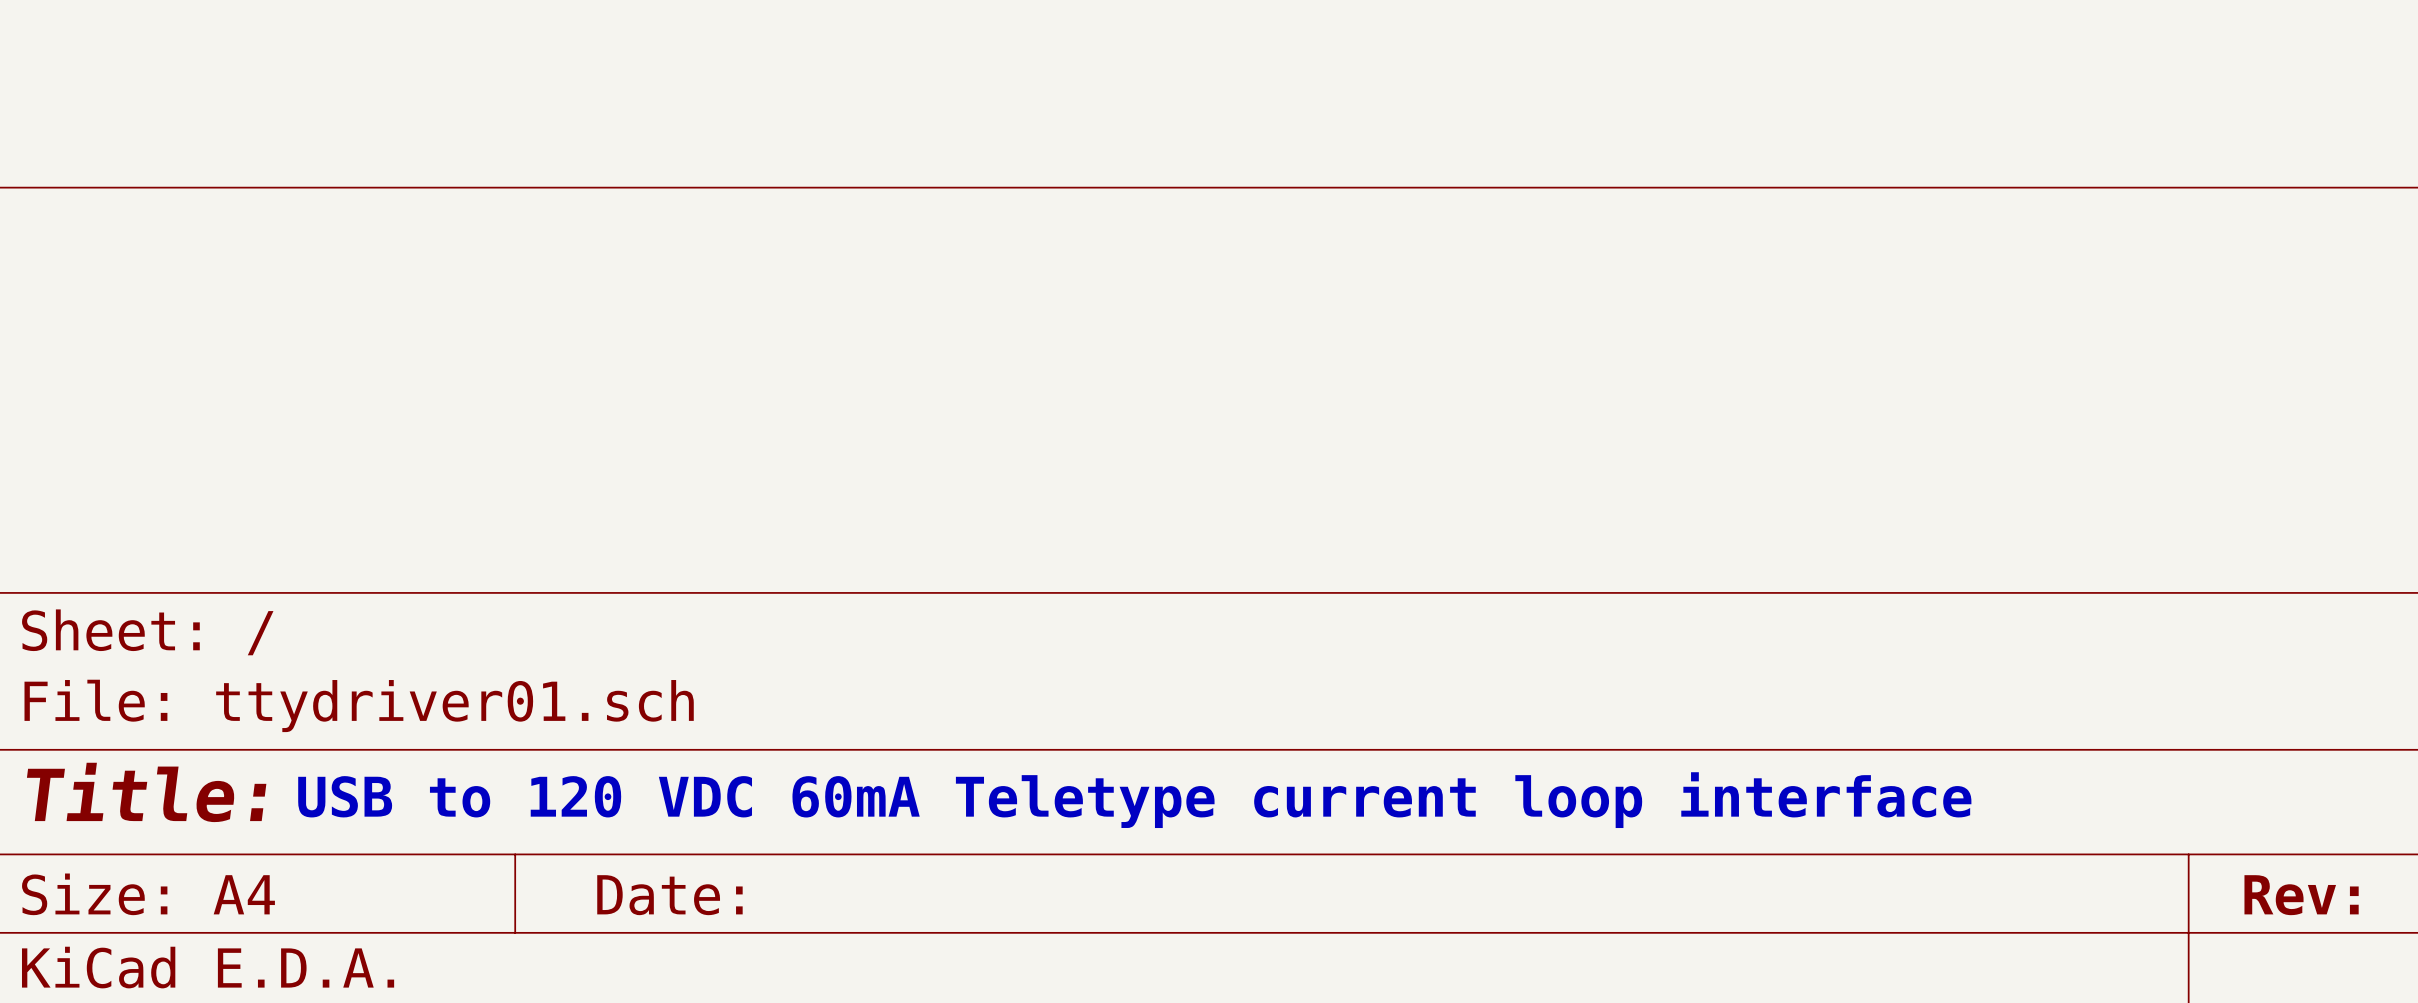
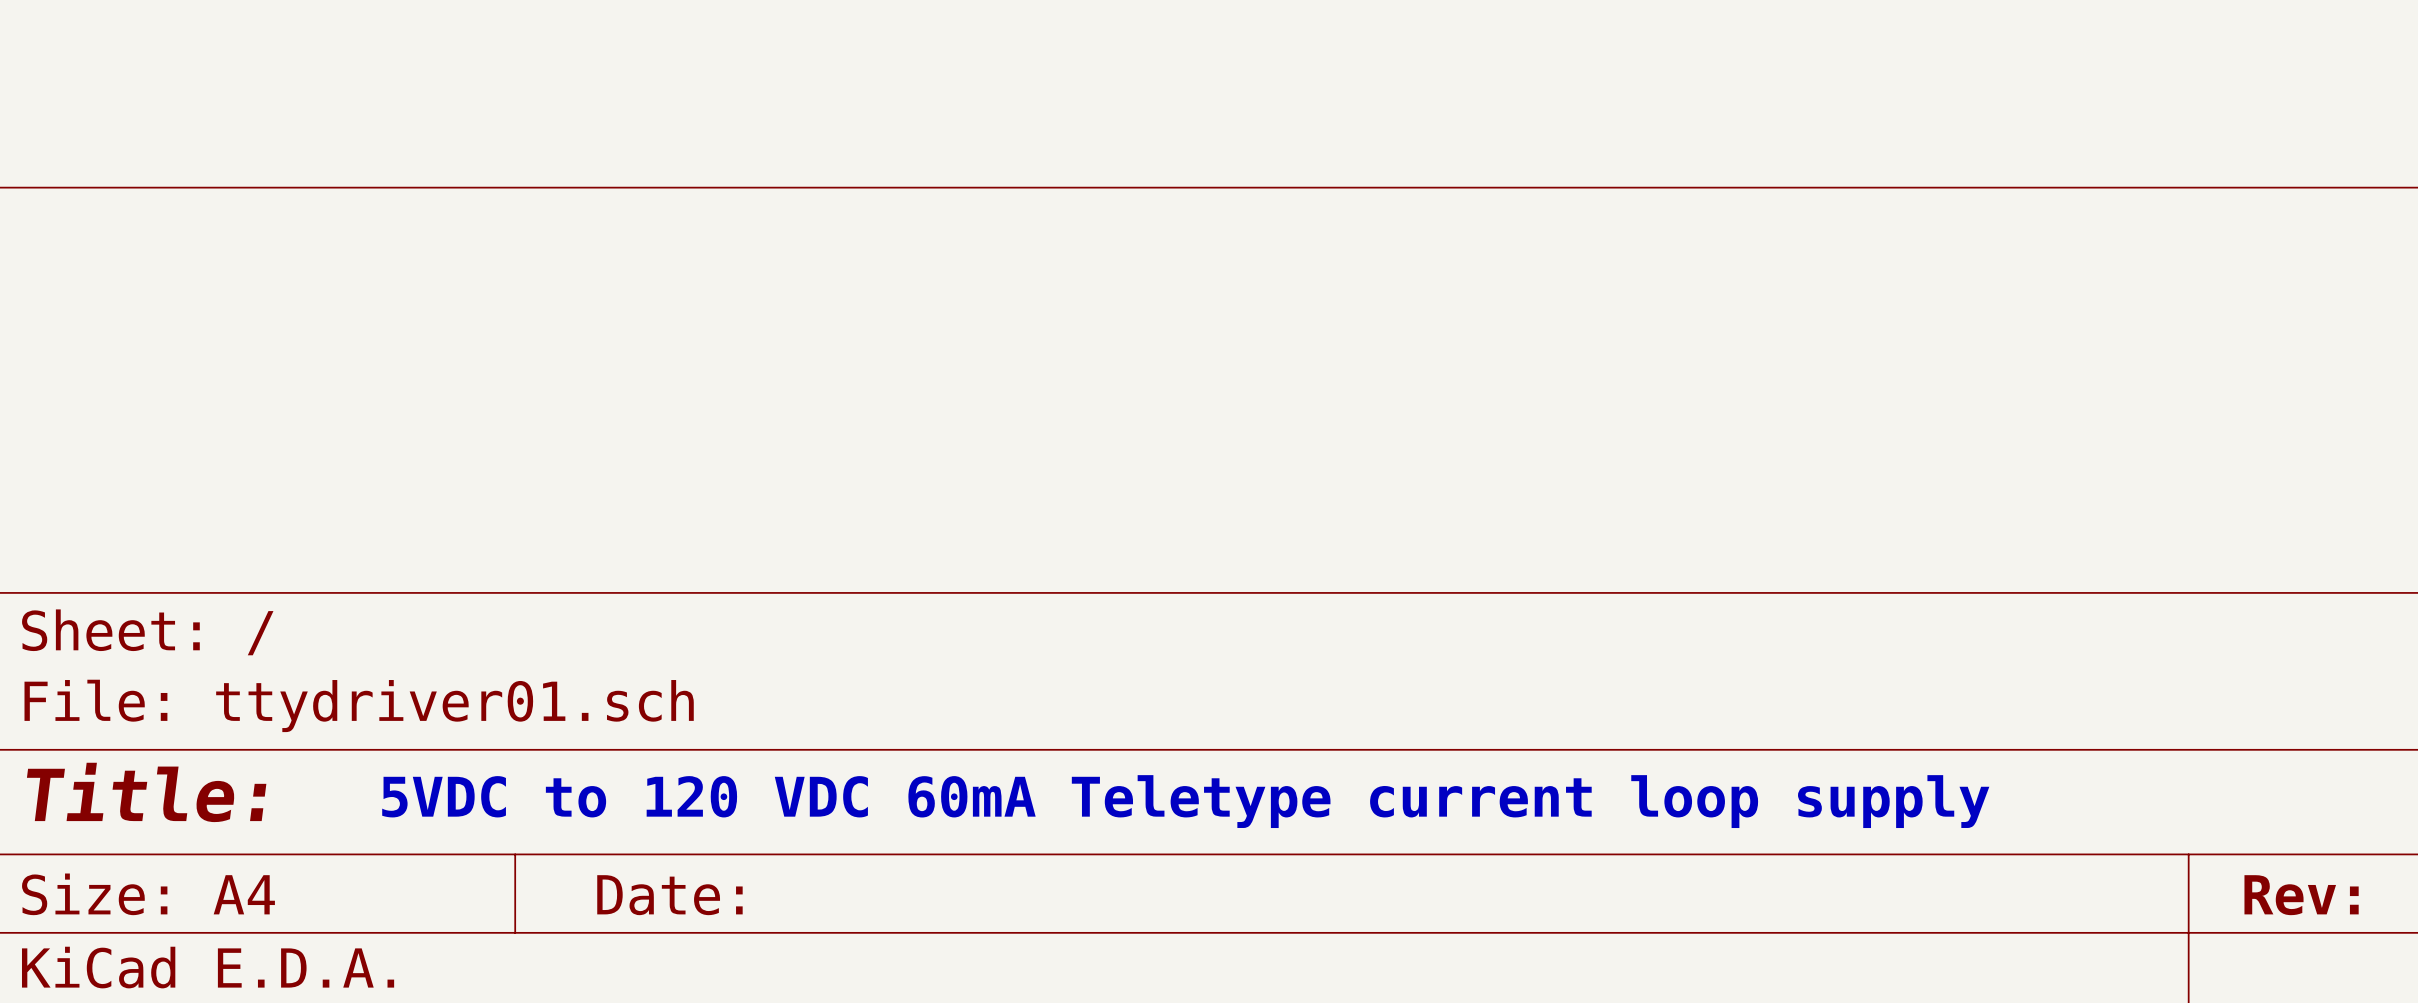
text: USB to 120 VDC 60mA Teletype current loop interface (1134, 800) -> 5VDC to 120 VDC 60mA Teletype current loop supply (1185, 801)

